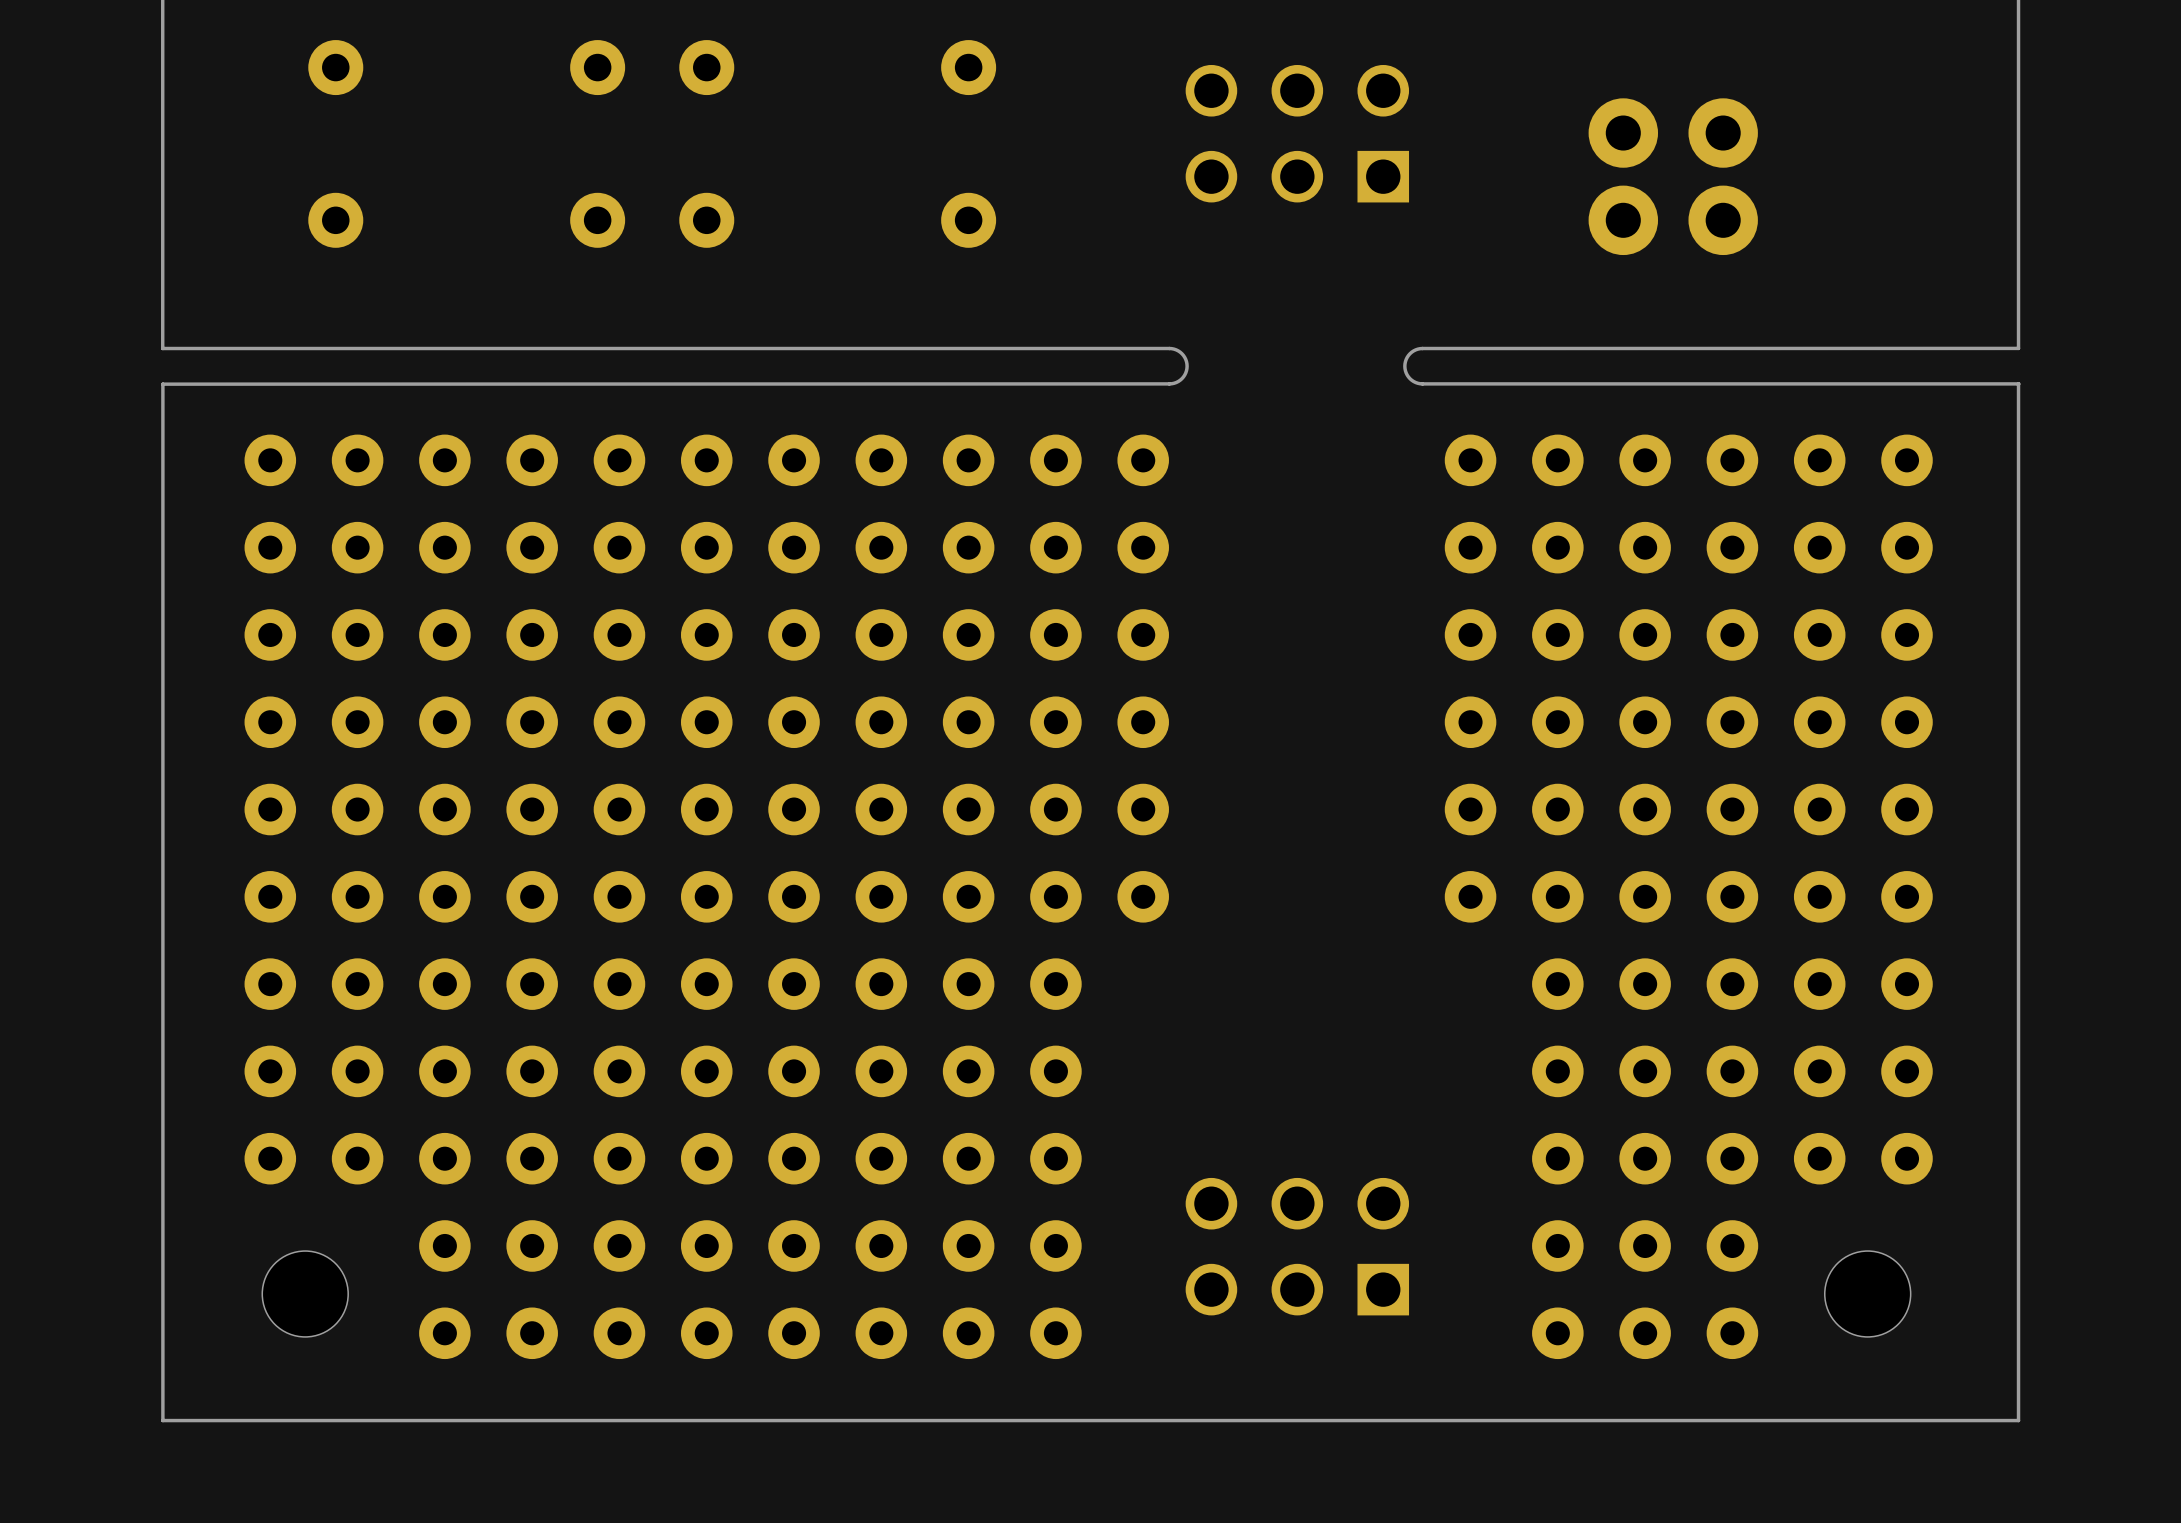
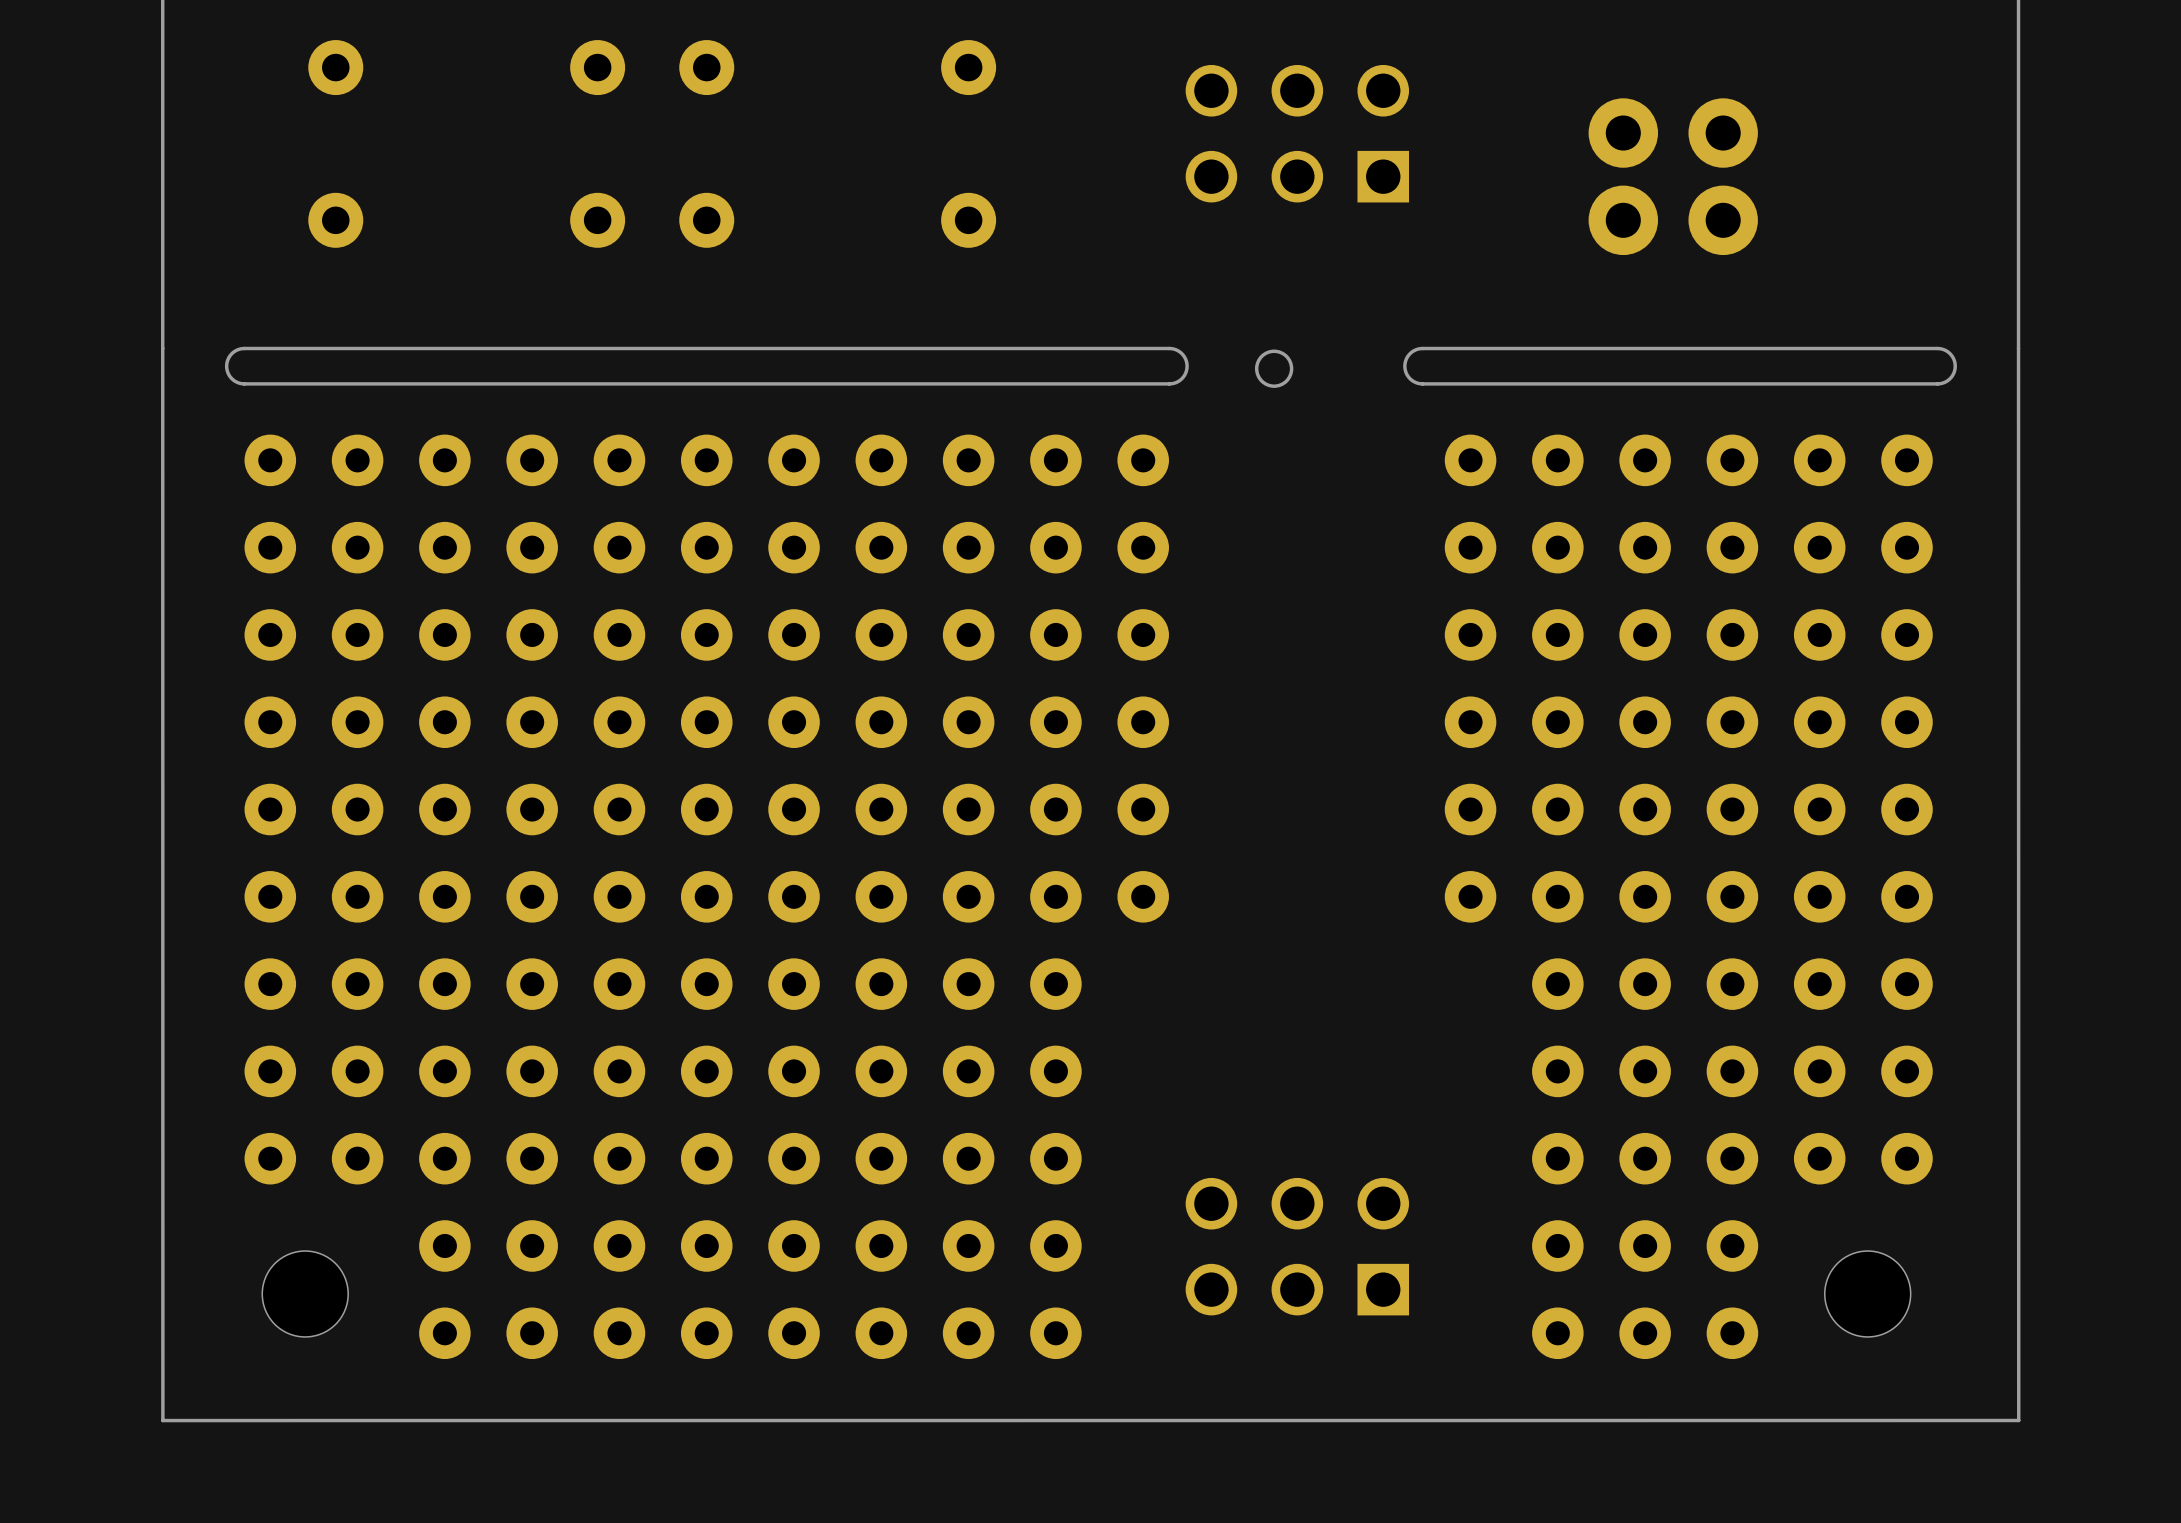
board edge: (244, 348) (162, 348) -> (244, 348) (232, 352) (227, 359) (226, 366) (227, 372) (232, 379) (244, 383) (1169, 383)
board edge: (2018, 348) (1422, 348) -> (1937, 383) (1943, 382) (1950, 377) (1955, 366) (1950, 354) (1939, 348) (1422, 348)
round board edge: none -> [1254, 349, 1294, 388]
board edge: (1169, 383) (162, 384) (162, 1420) -> (162, 348) (162, 1420)
board edge: (2018, 383) (2018, 1420) -> (2018, 348) (2018, 1420)
board edge: (2018, 383) (1937, 383) -> none

